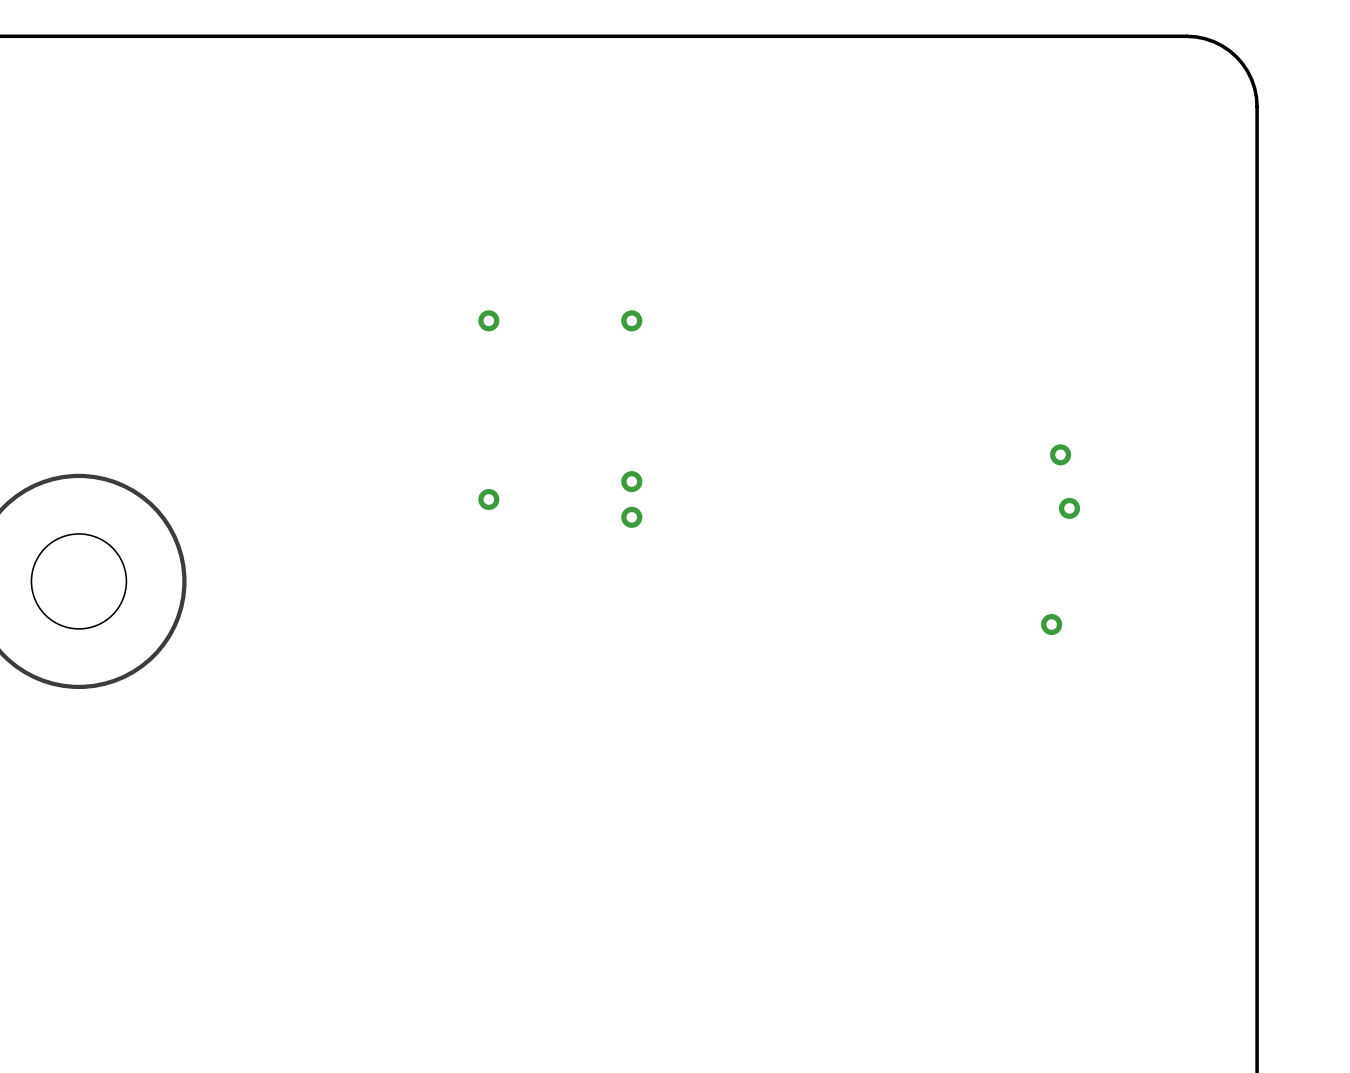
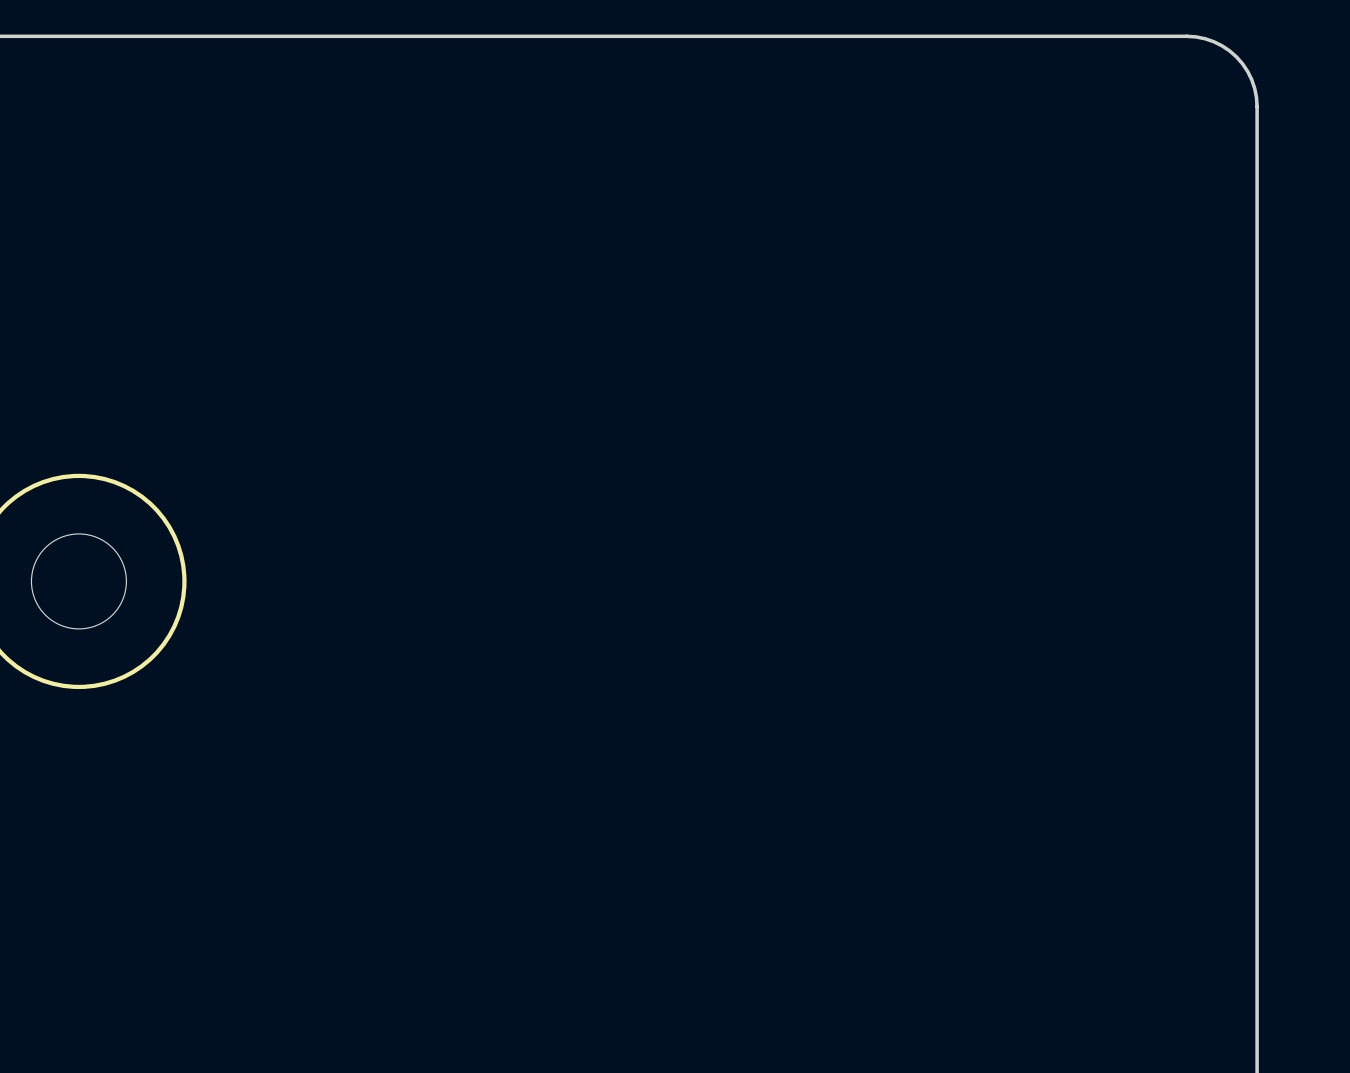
via: (488, 320) -> none
via: (631, 320) -> none
via: (1060, 454) -> none
via: (631, 481) -> none
via: (488, 499) -> none
via: (1069, 508) -> none
via: (631, 517) -> none
via: (1051, 624) -> none

